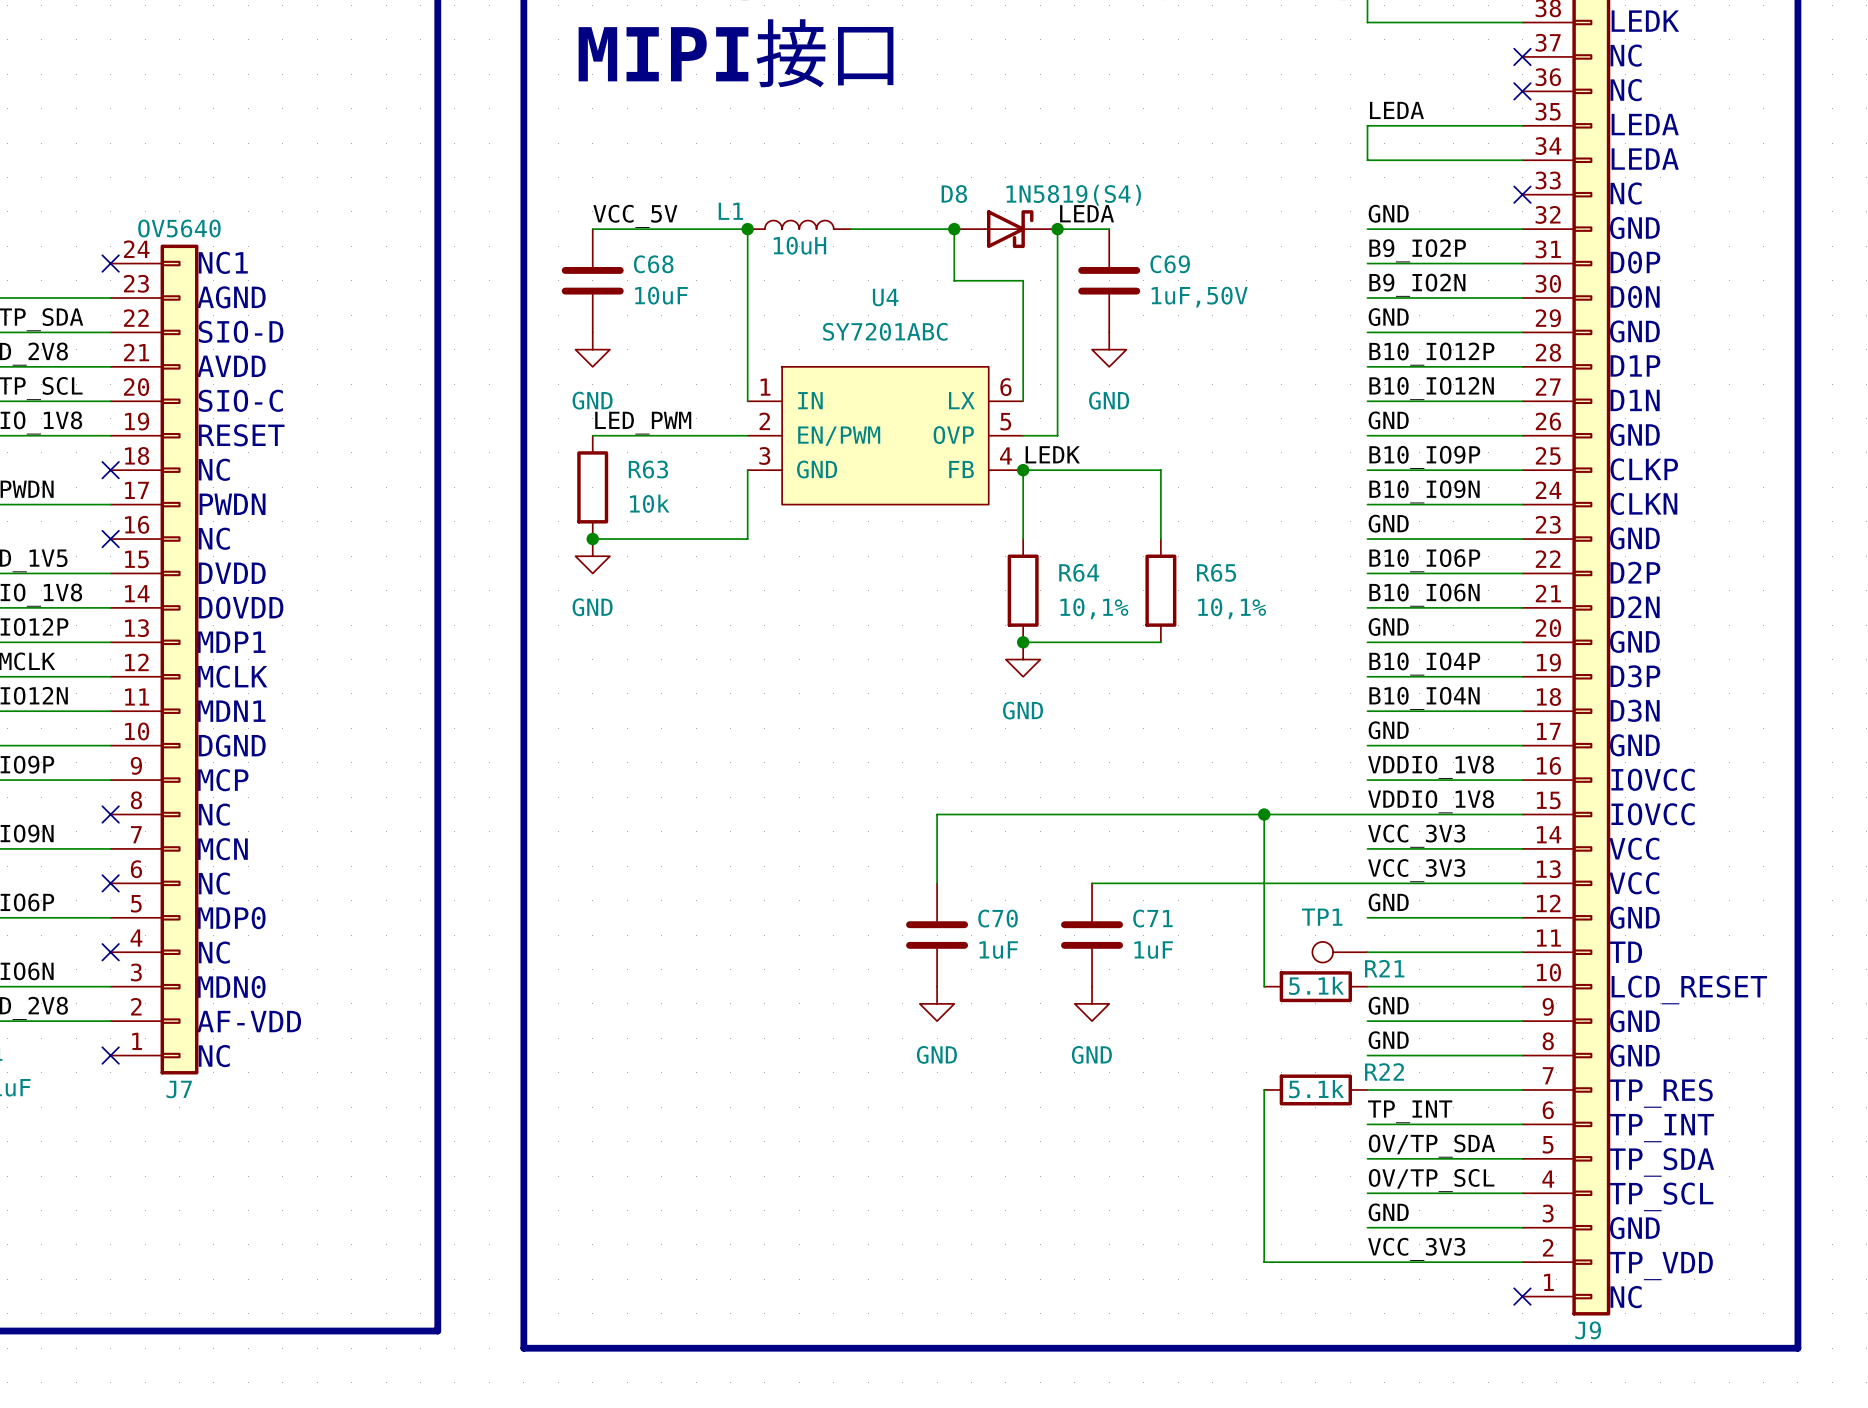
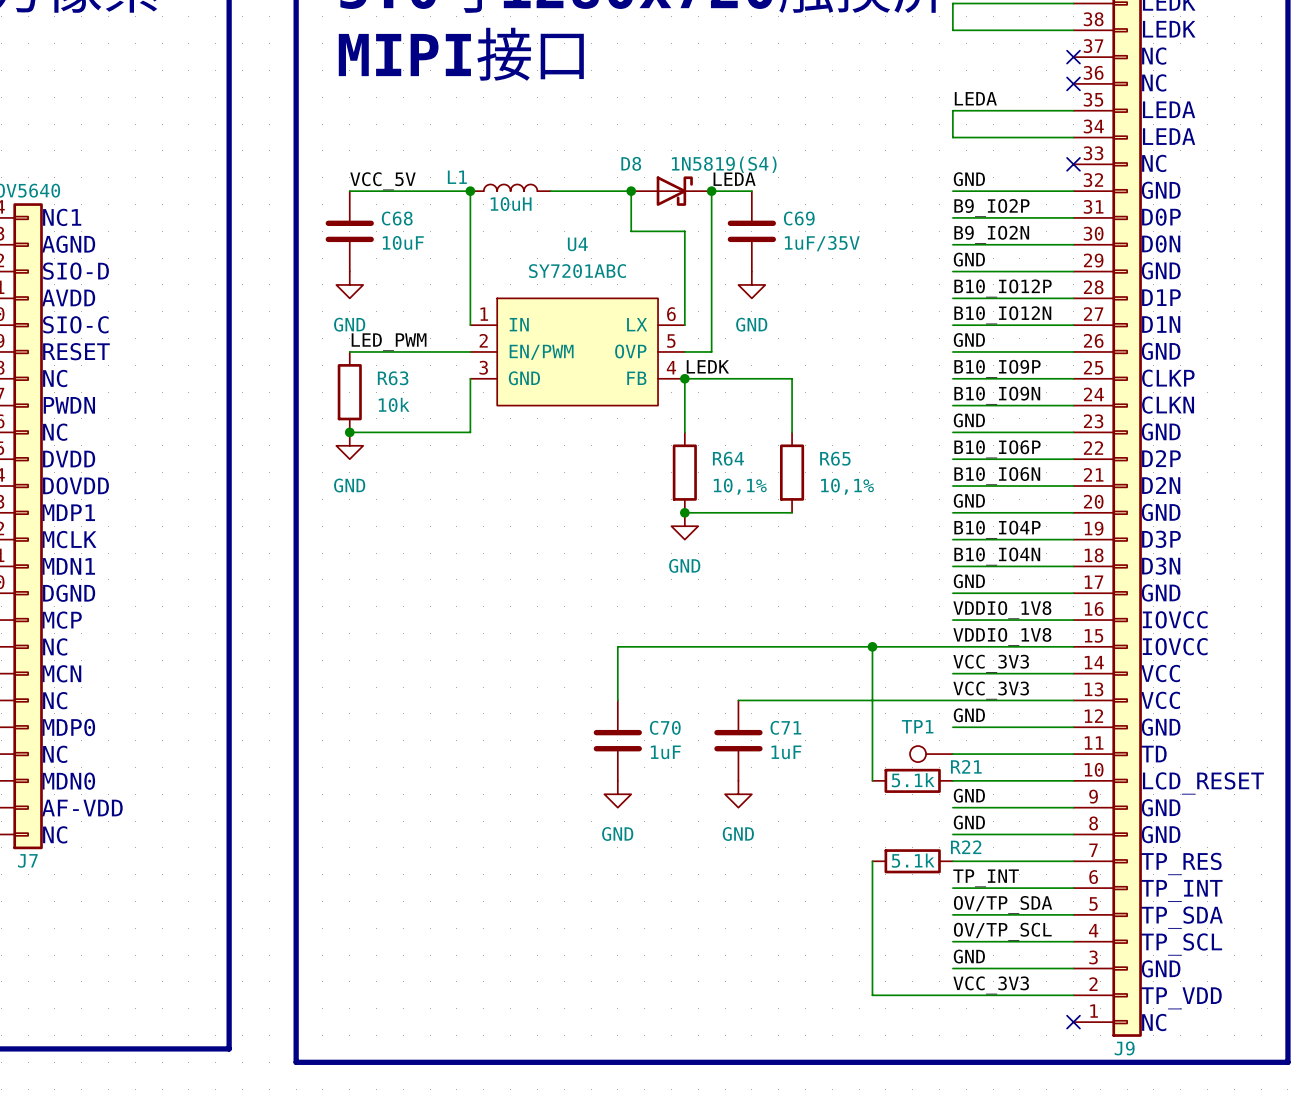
C69 value: 1uF,50V (1199, 297) -> 1uF/35V (822, 243)

